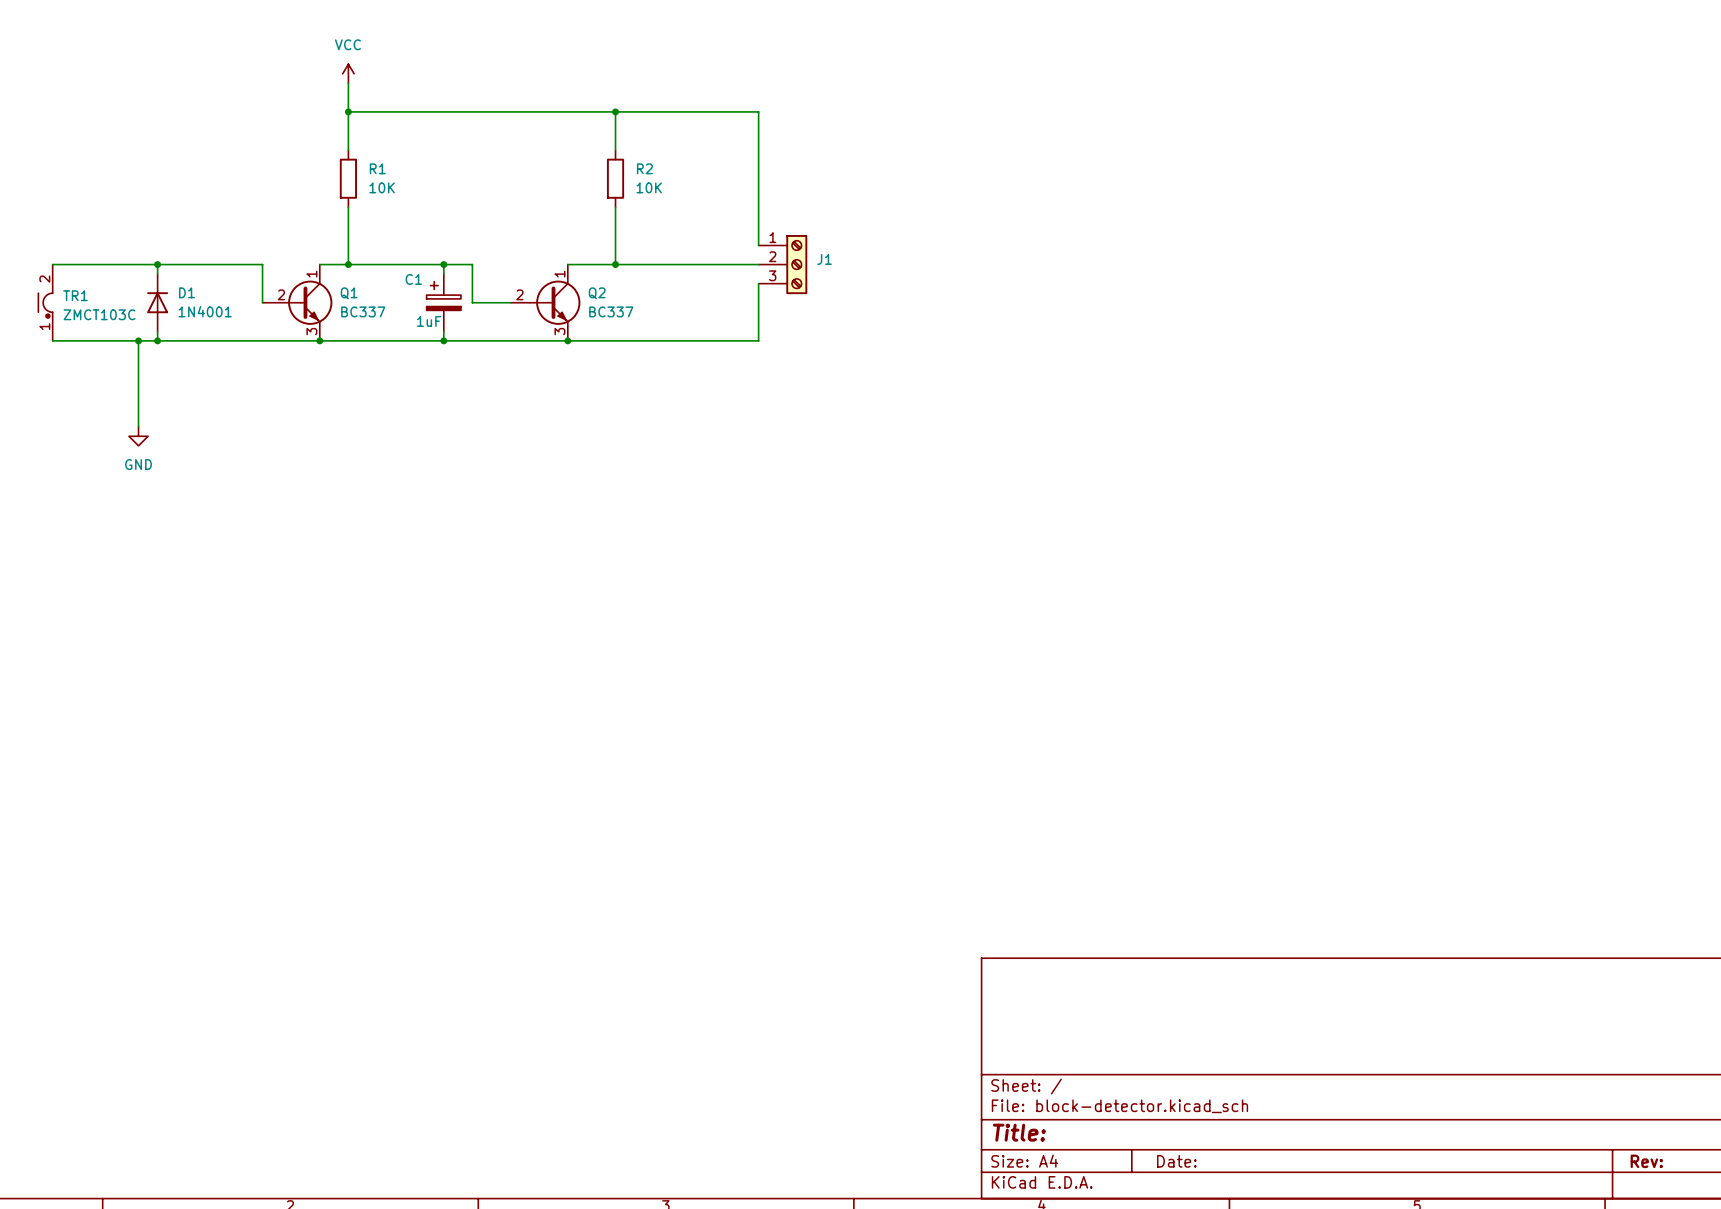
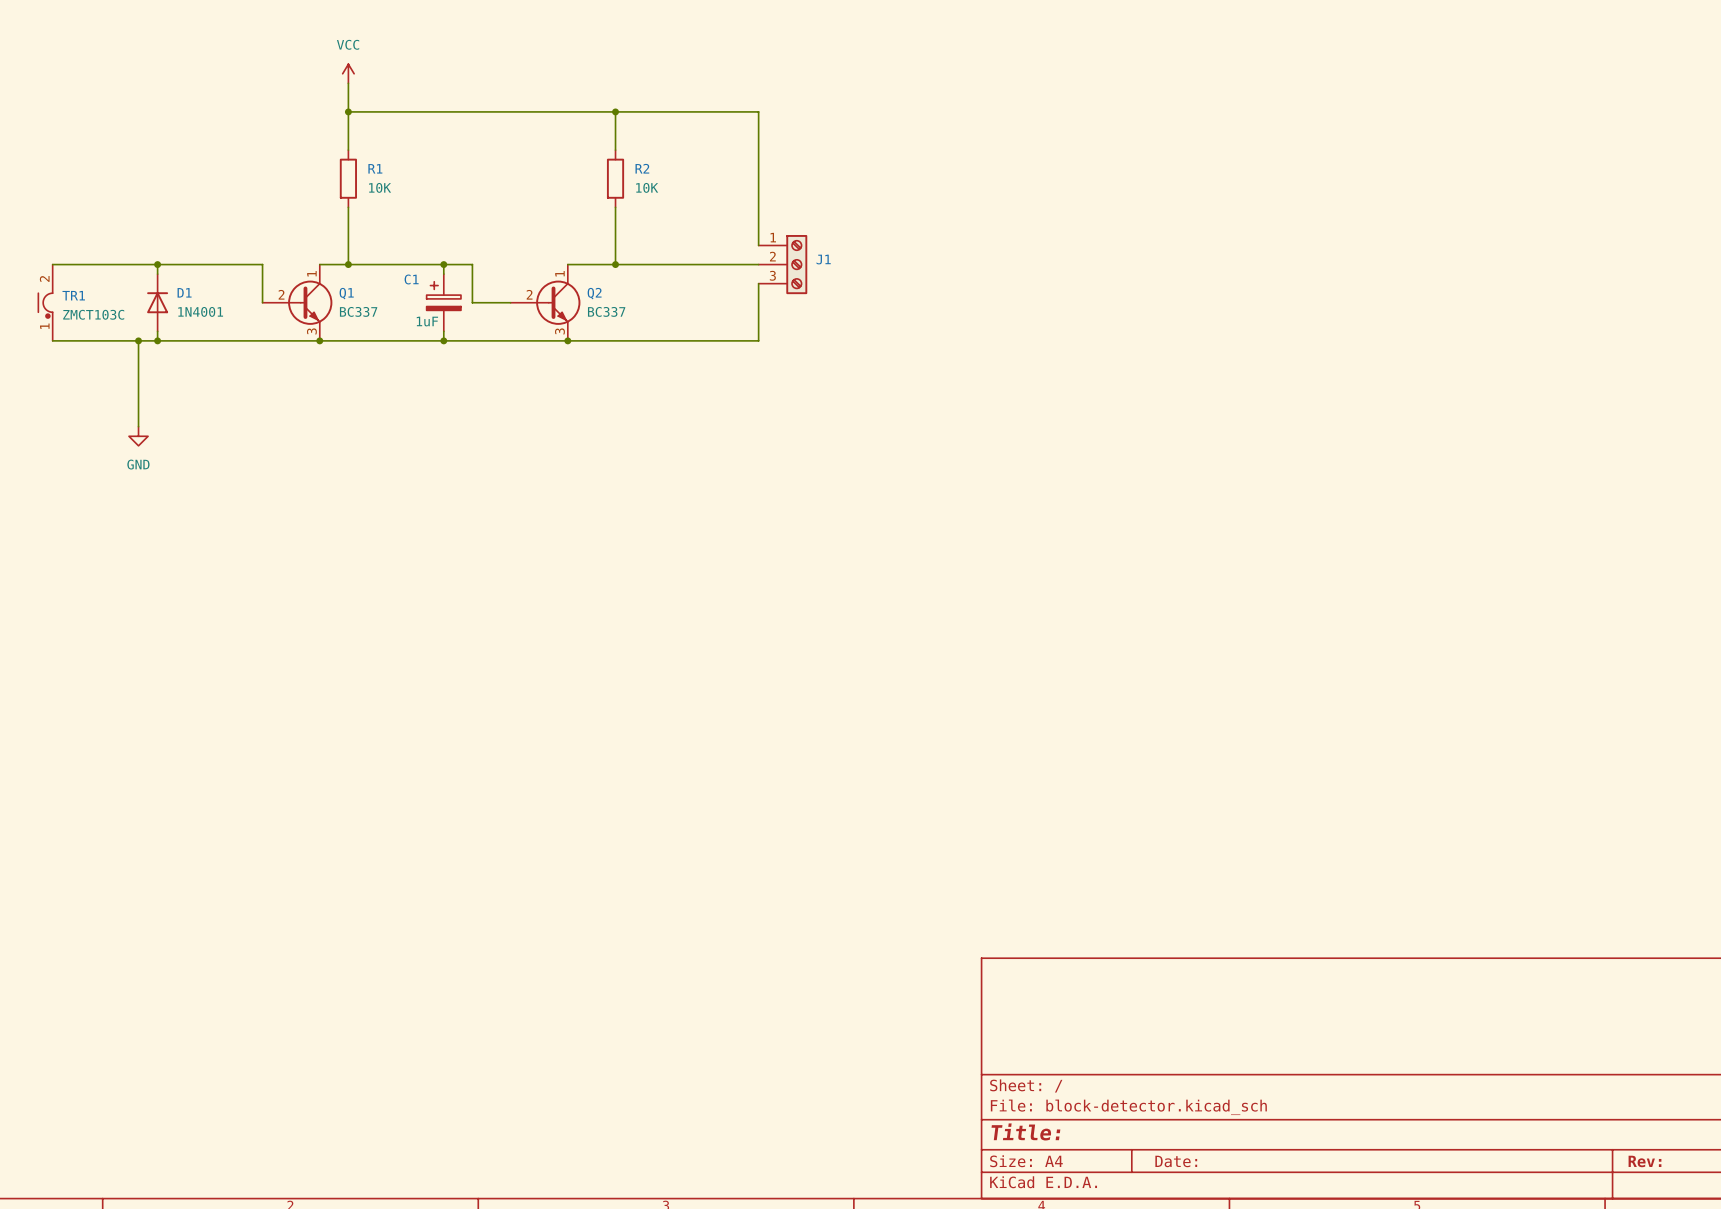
Q2 symbol: [510, 264, 581, 341] -> [510, 264, 581, 341]

